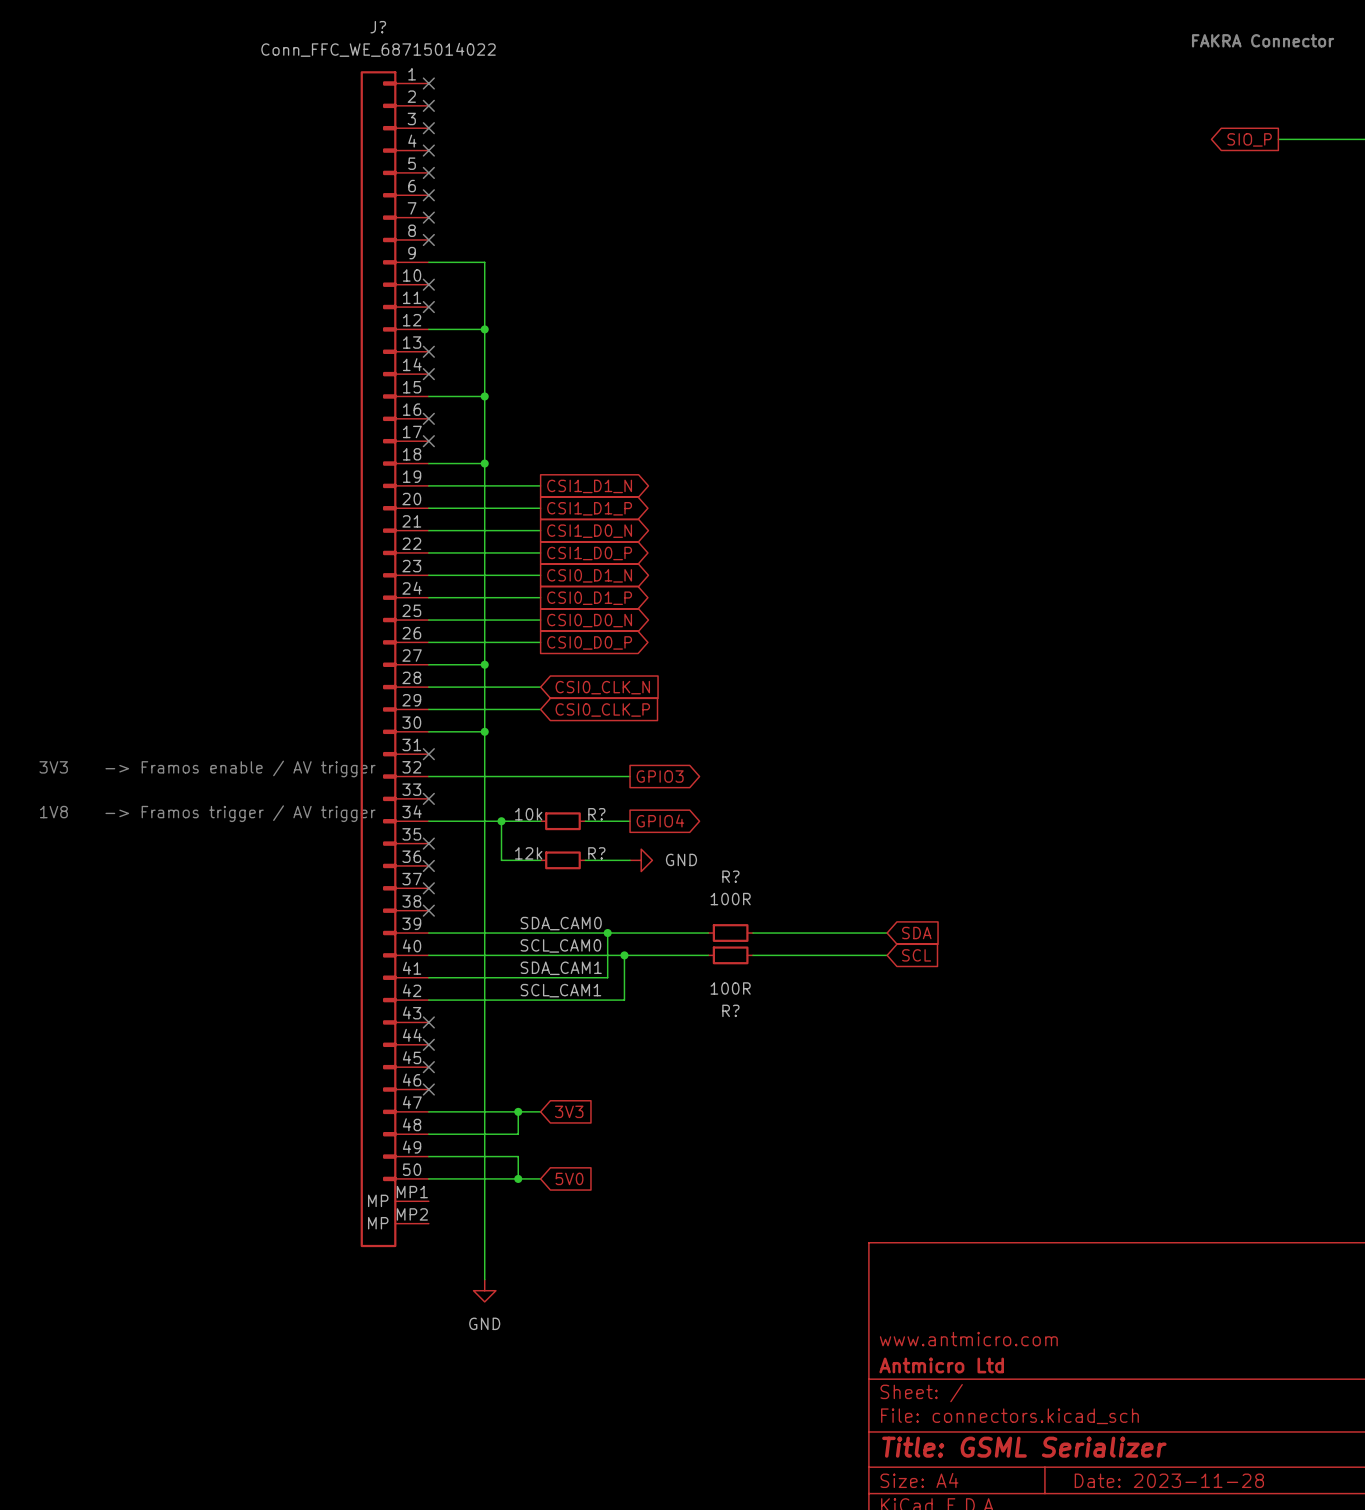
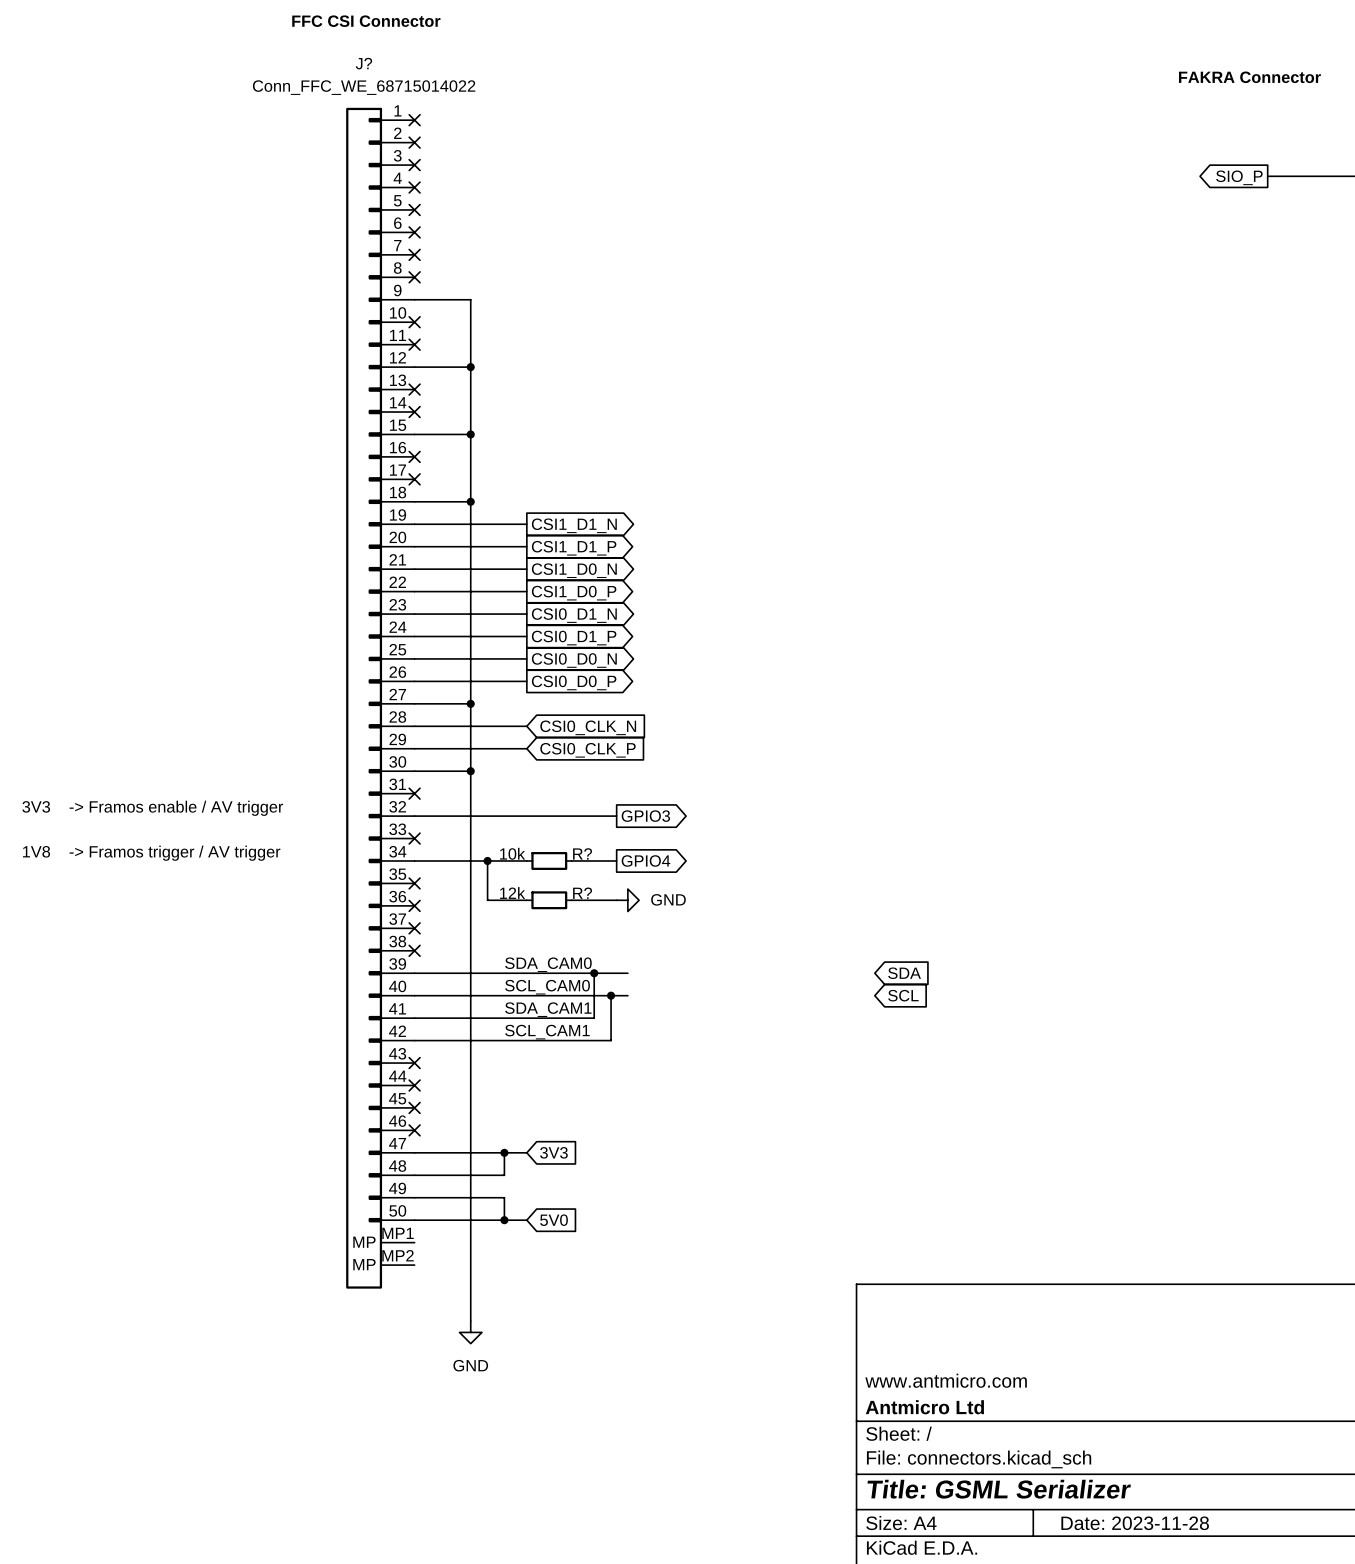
wire: (641, 933) (708, 933) -> none
R?: (730, 933) -> none
wire: (753, 933) (887, 933) -> none
wire: (641, 955) (708, 955) -> none
R?: (730, 955) -> none
wire: (753, 955) (887, 955) -> none

